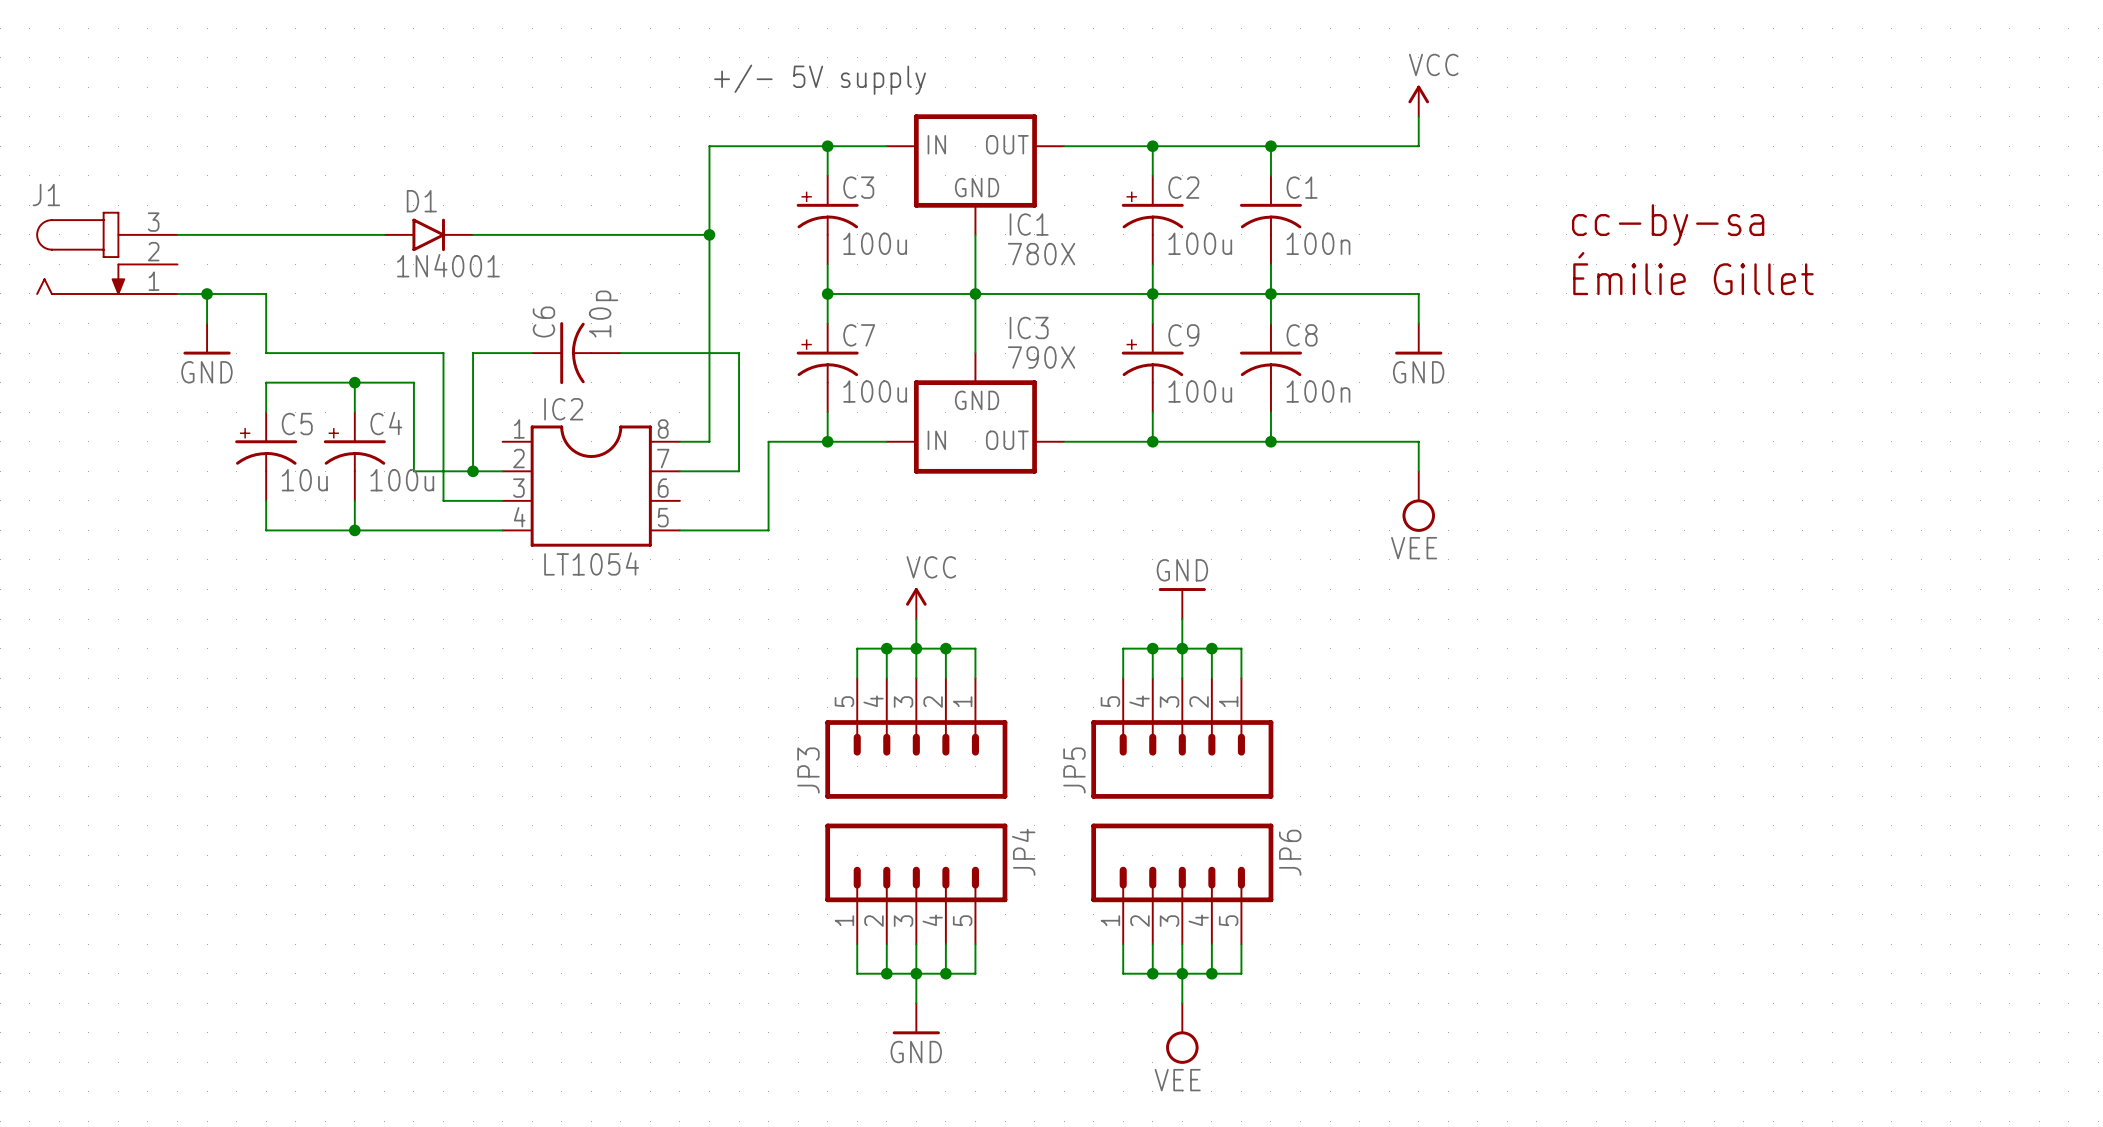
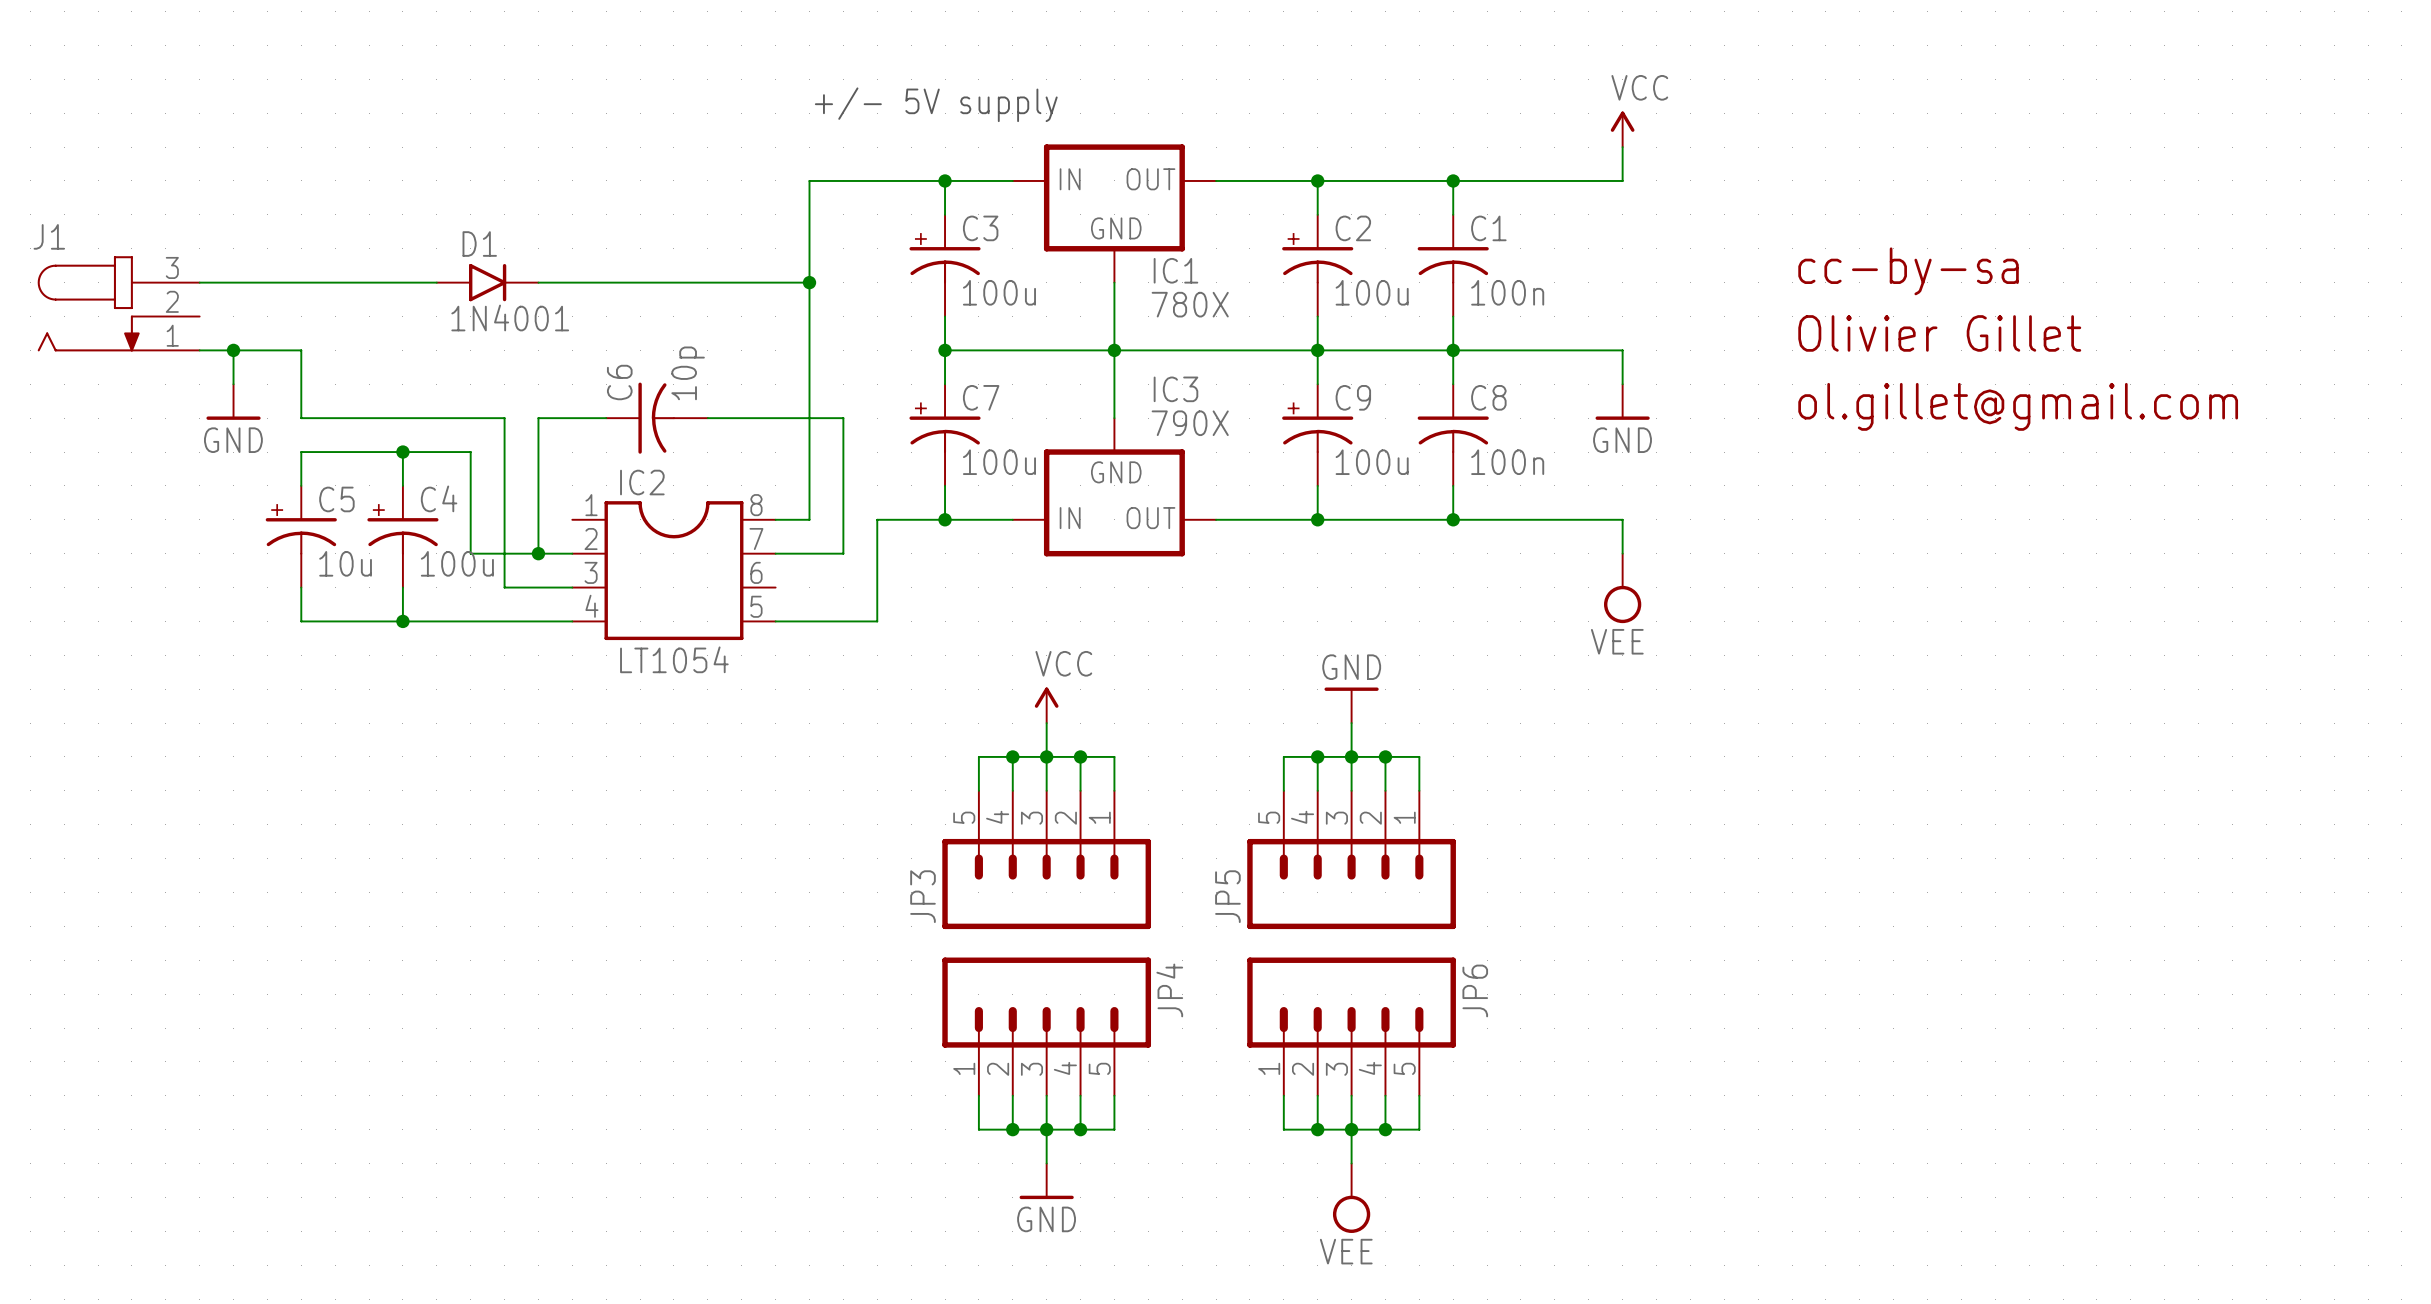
text: Émilie Gillet (1693, 273) -> Olivier Gillet (1939, 333)
text: none -> ol.gillet@gmail.com (2018, 406)

